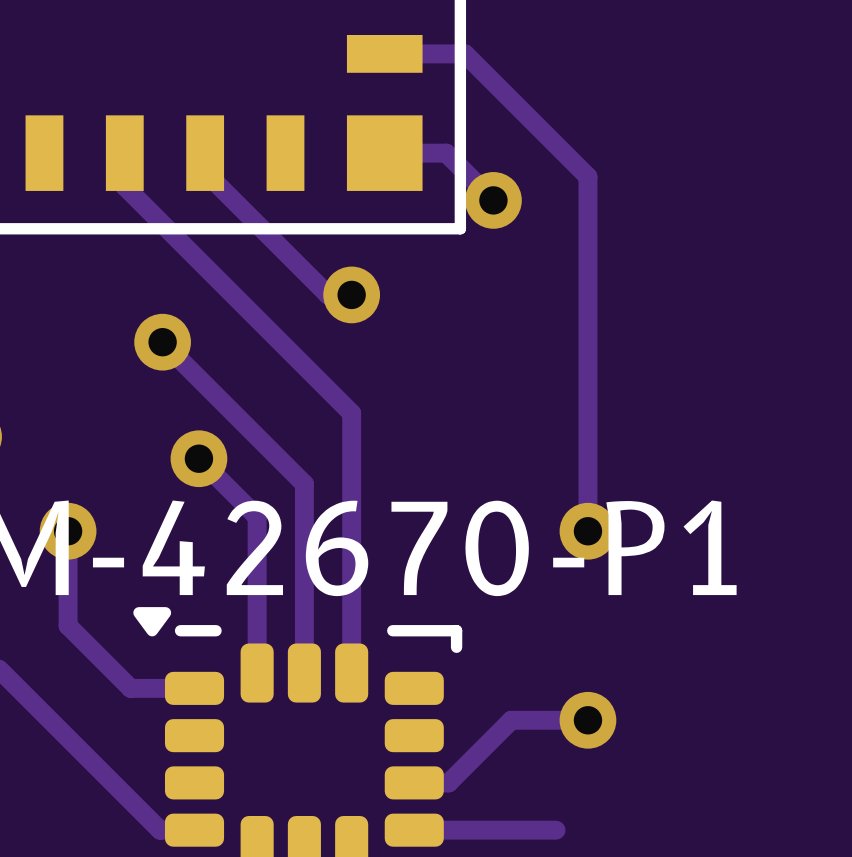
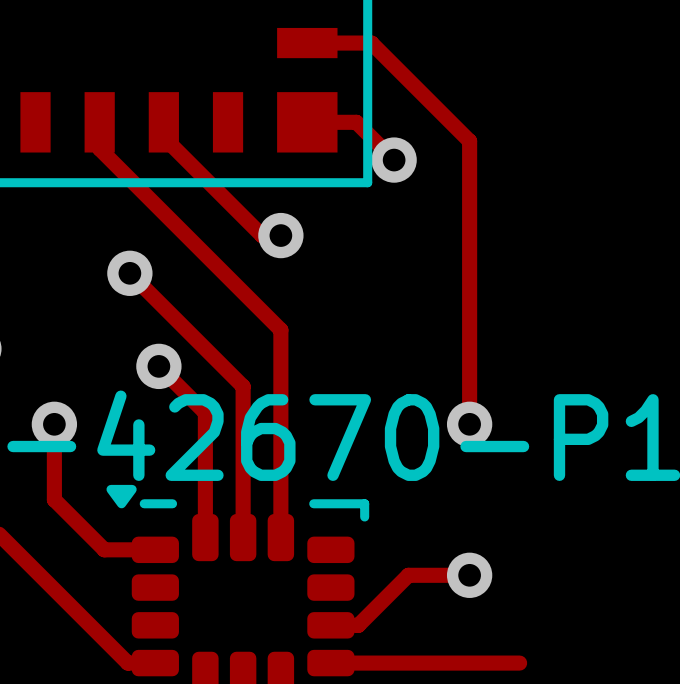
track: none -> (444, 663) (519, 663)

